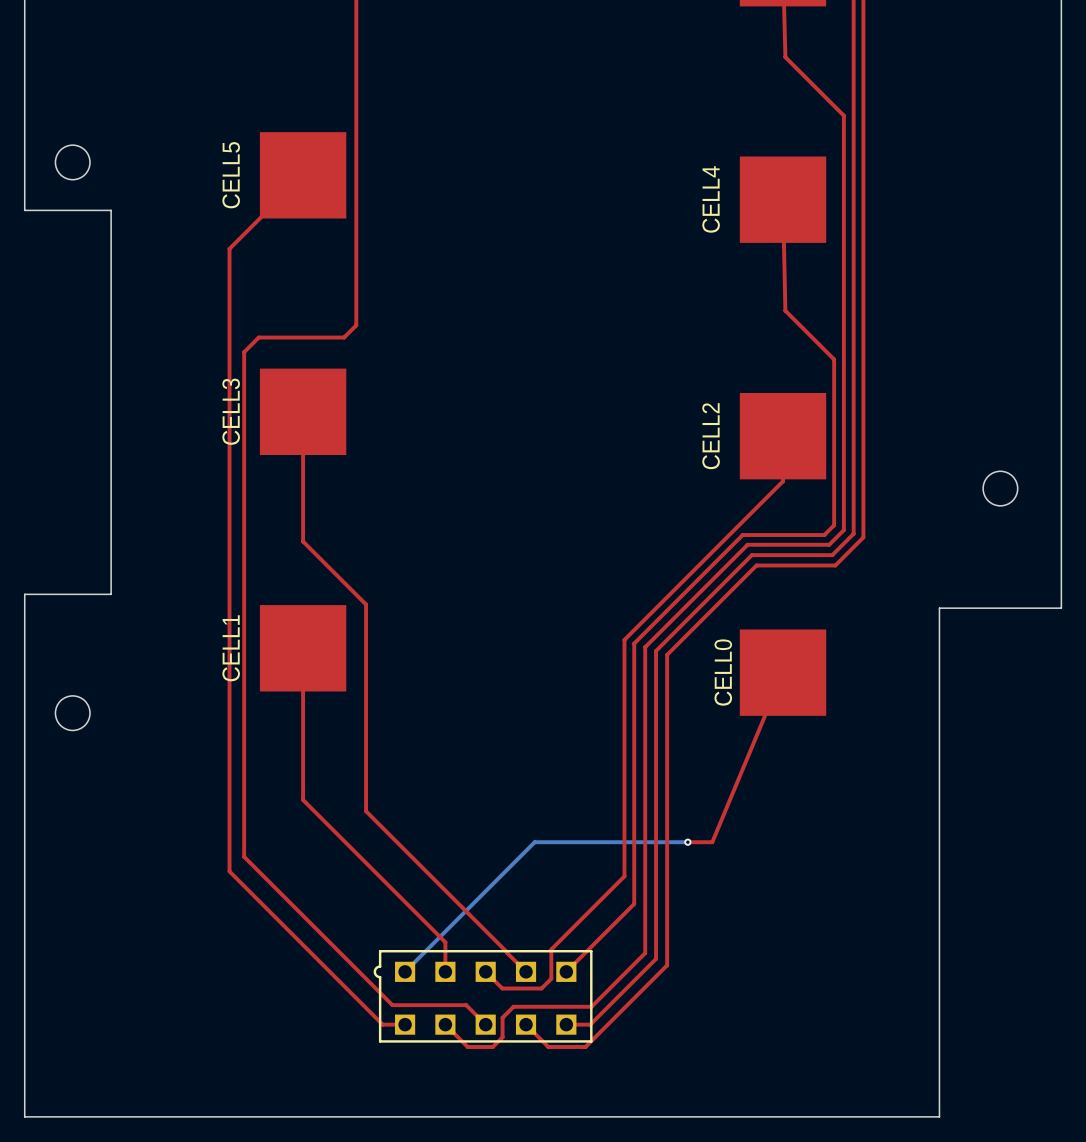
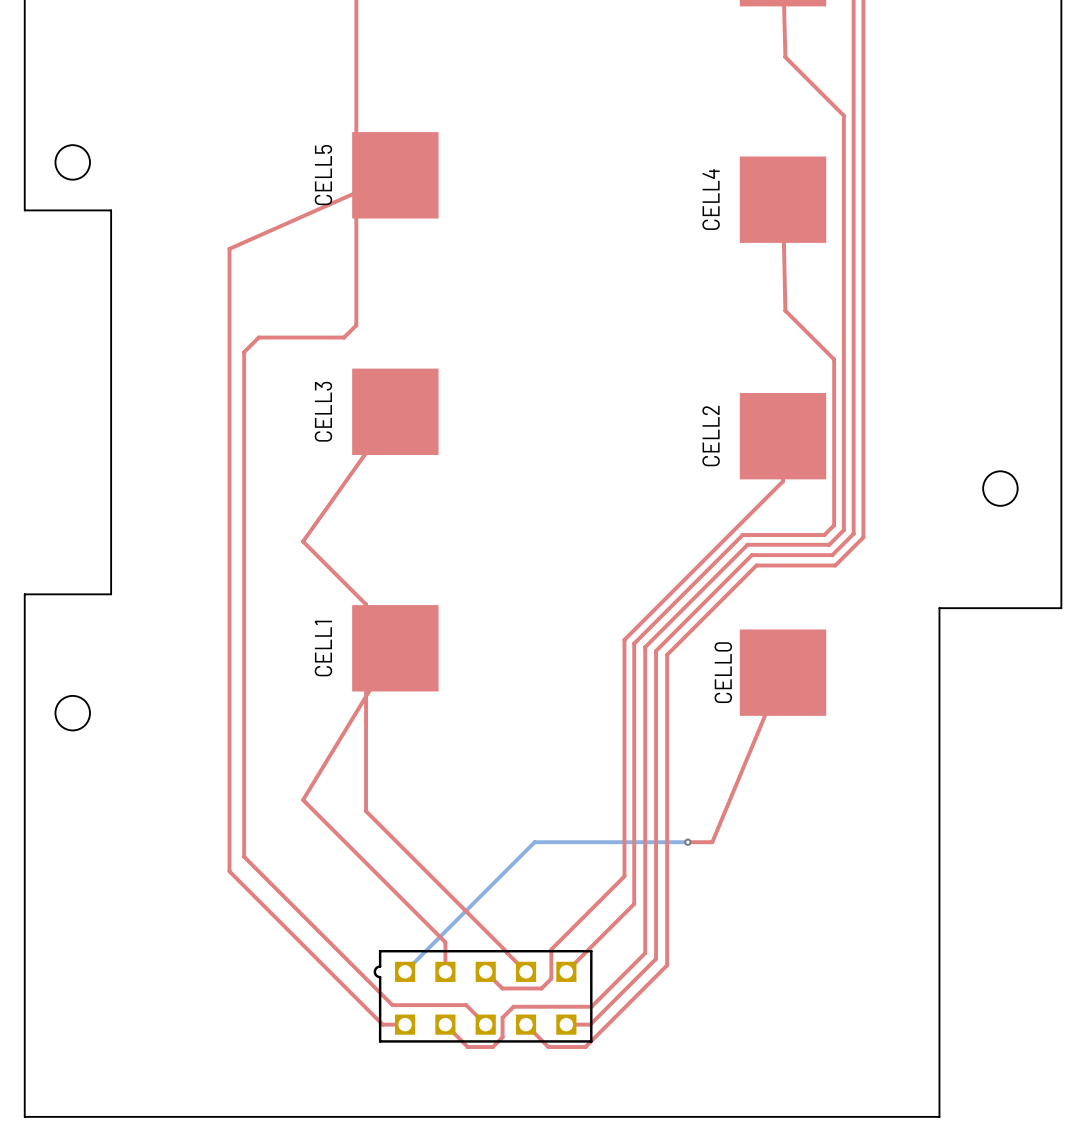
top track: (303, 175) (229, 248) -> (395, 175) (229, 248)
CELL5 position: (303, 175) -> (395, 175)
top track: (303, 411) (303, 541) -> (395, 411) (303, 541)
CELL3 position: (303, 411) -> (395, 411)
top track: (303, 648) (303, 799) -> (395, 648) (303, 799)
CELL1 position: (303, 648) -> (395, 648)

